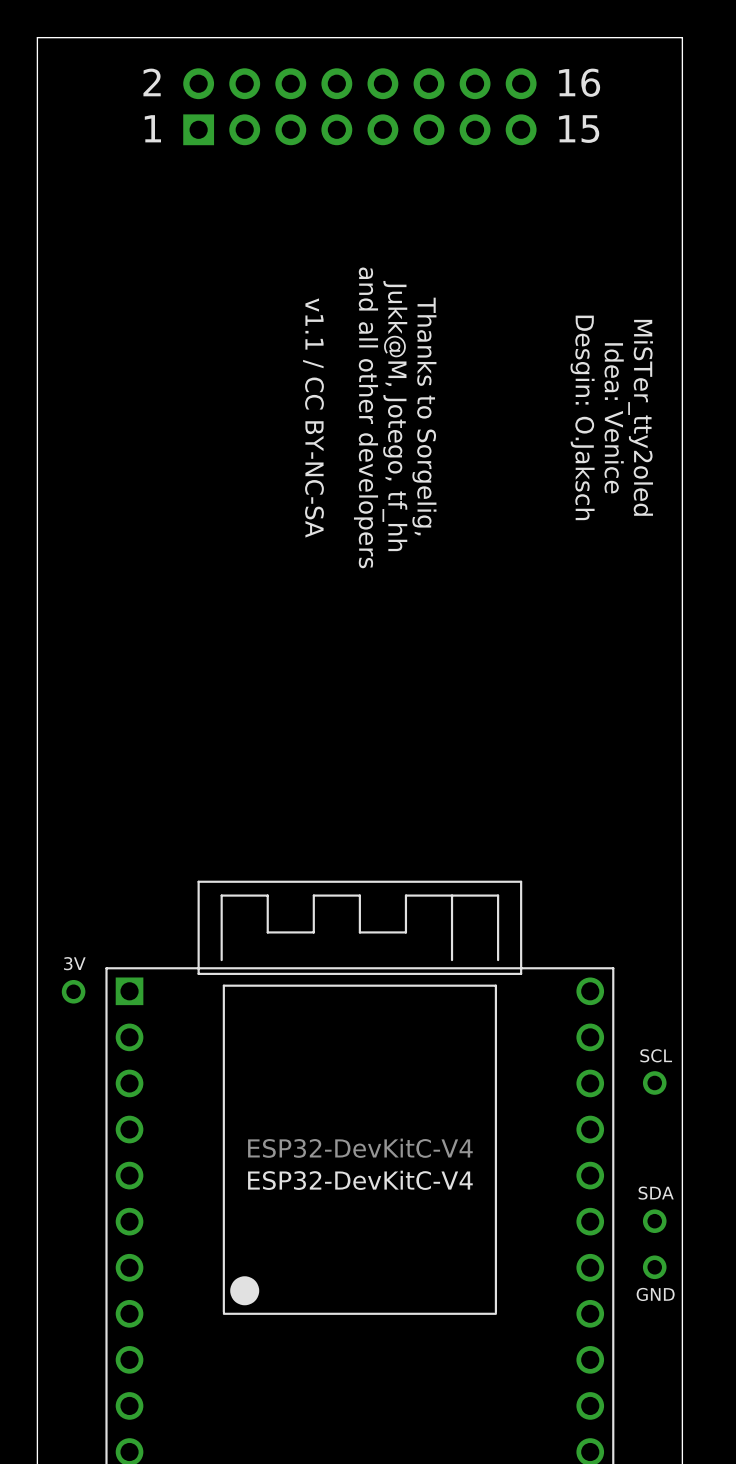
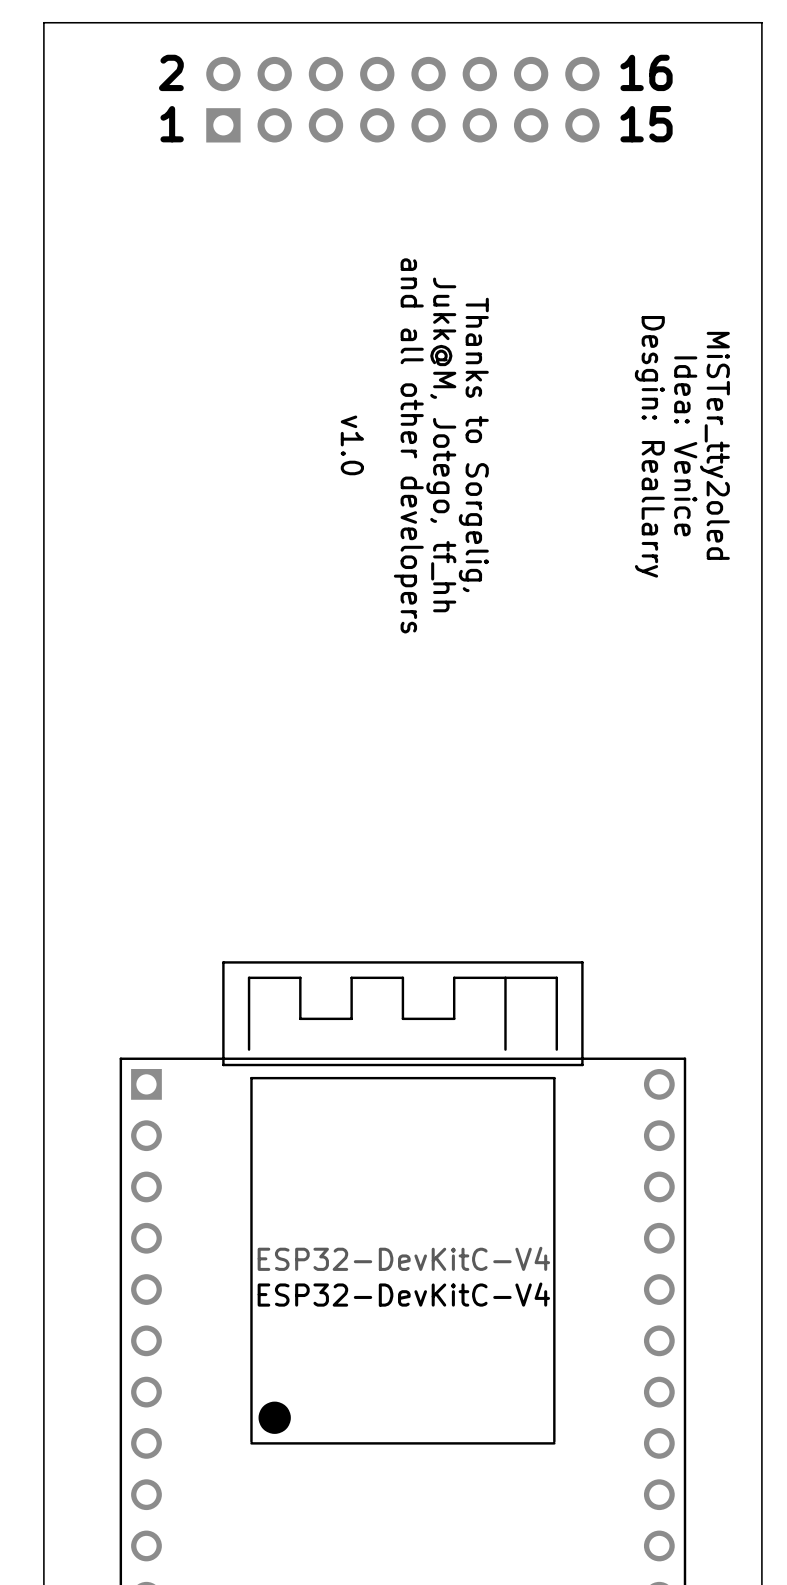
text: Desgin: O.Jaksch (582, 417) -> Desgin: RealLarry (649, 446)
text: v1.1 / CC BY-NC-SA (313, 418) -> v1.0 (352, 445)
text: 3V (74, 963) -> none
part: (73, 991) -> none
text: SCL (656, 1055) -> none
part: (654, 1082) -> none
text: SDA (656, 1193) -> none
part: (654, 1221) -> none
part: (654, 1267) -> none
text: GND (655, 1294) -> none

